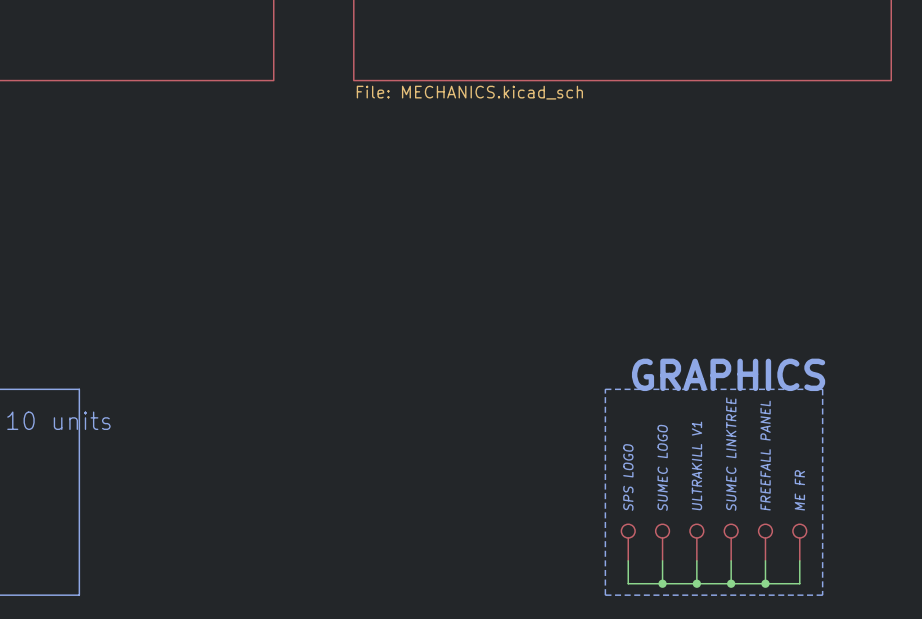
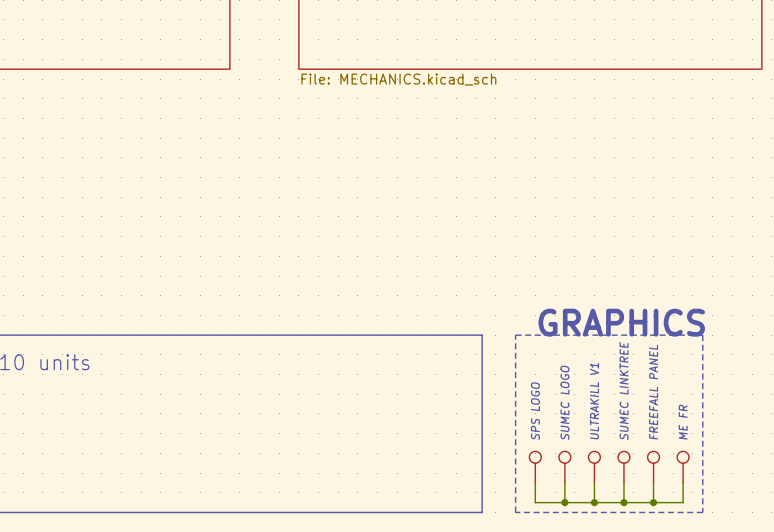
line: (79, 389) (79, 595) -> (62, 335) (482, 335) (482, 512) (62, 512)

